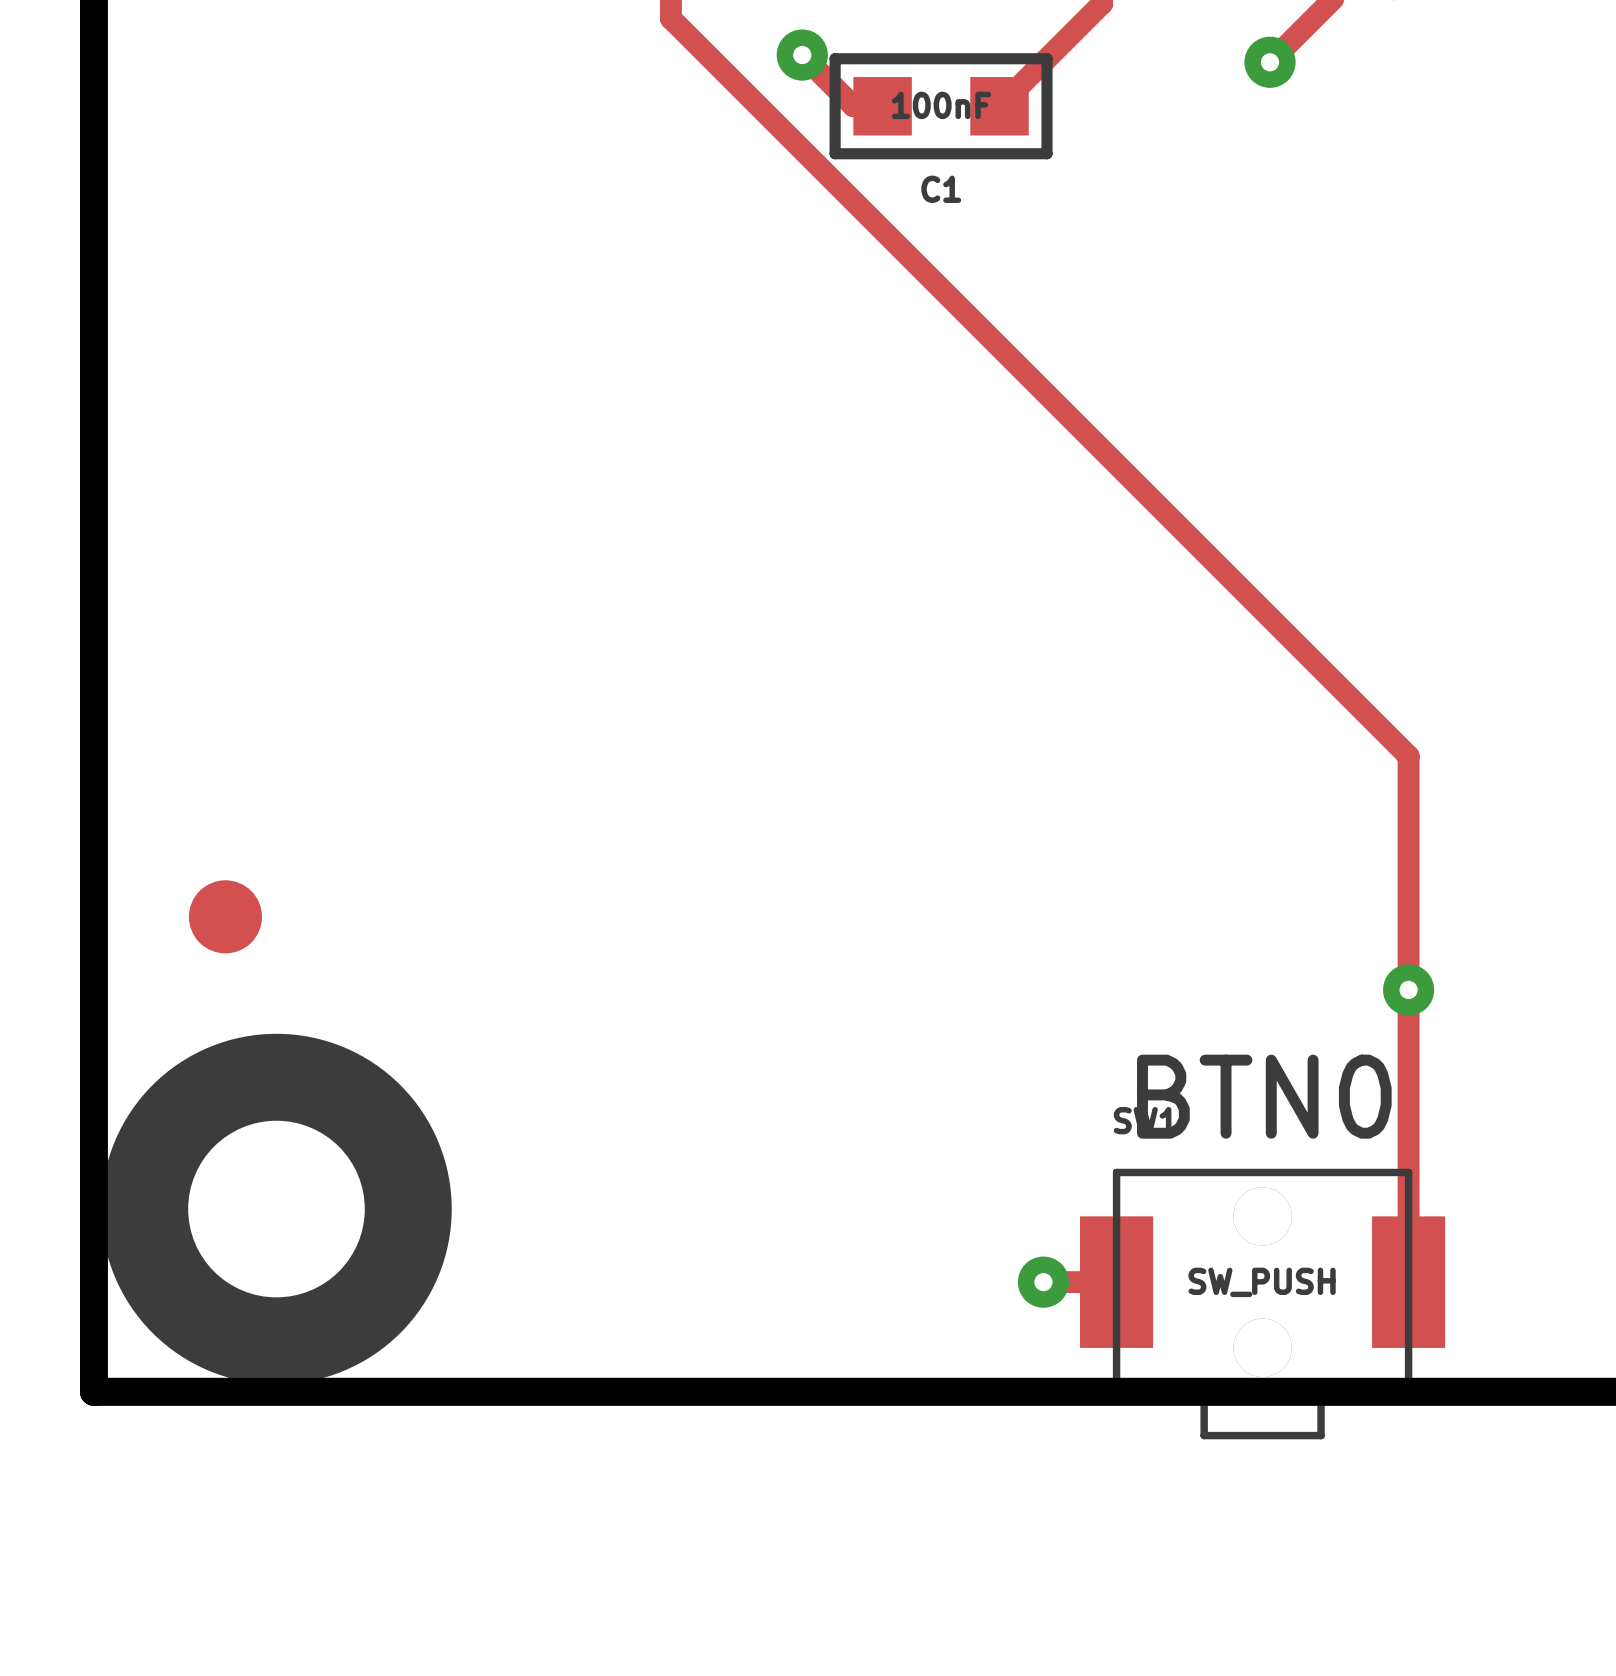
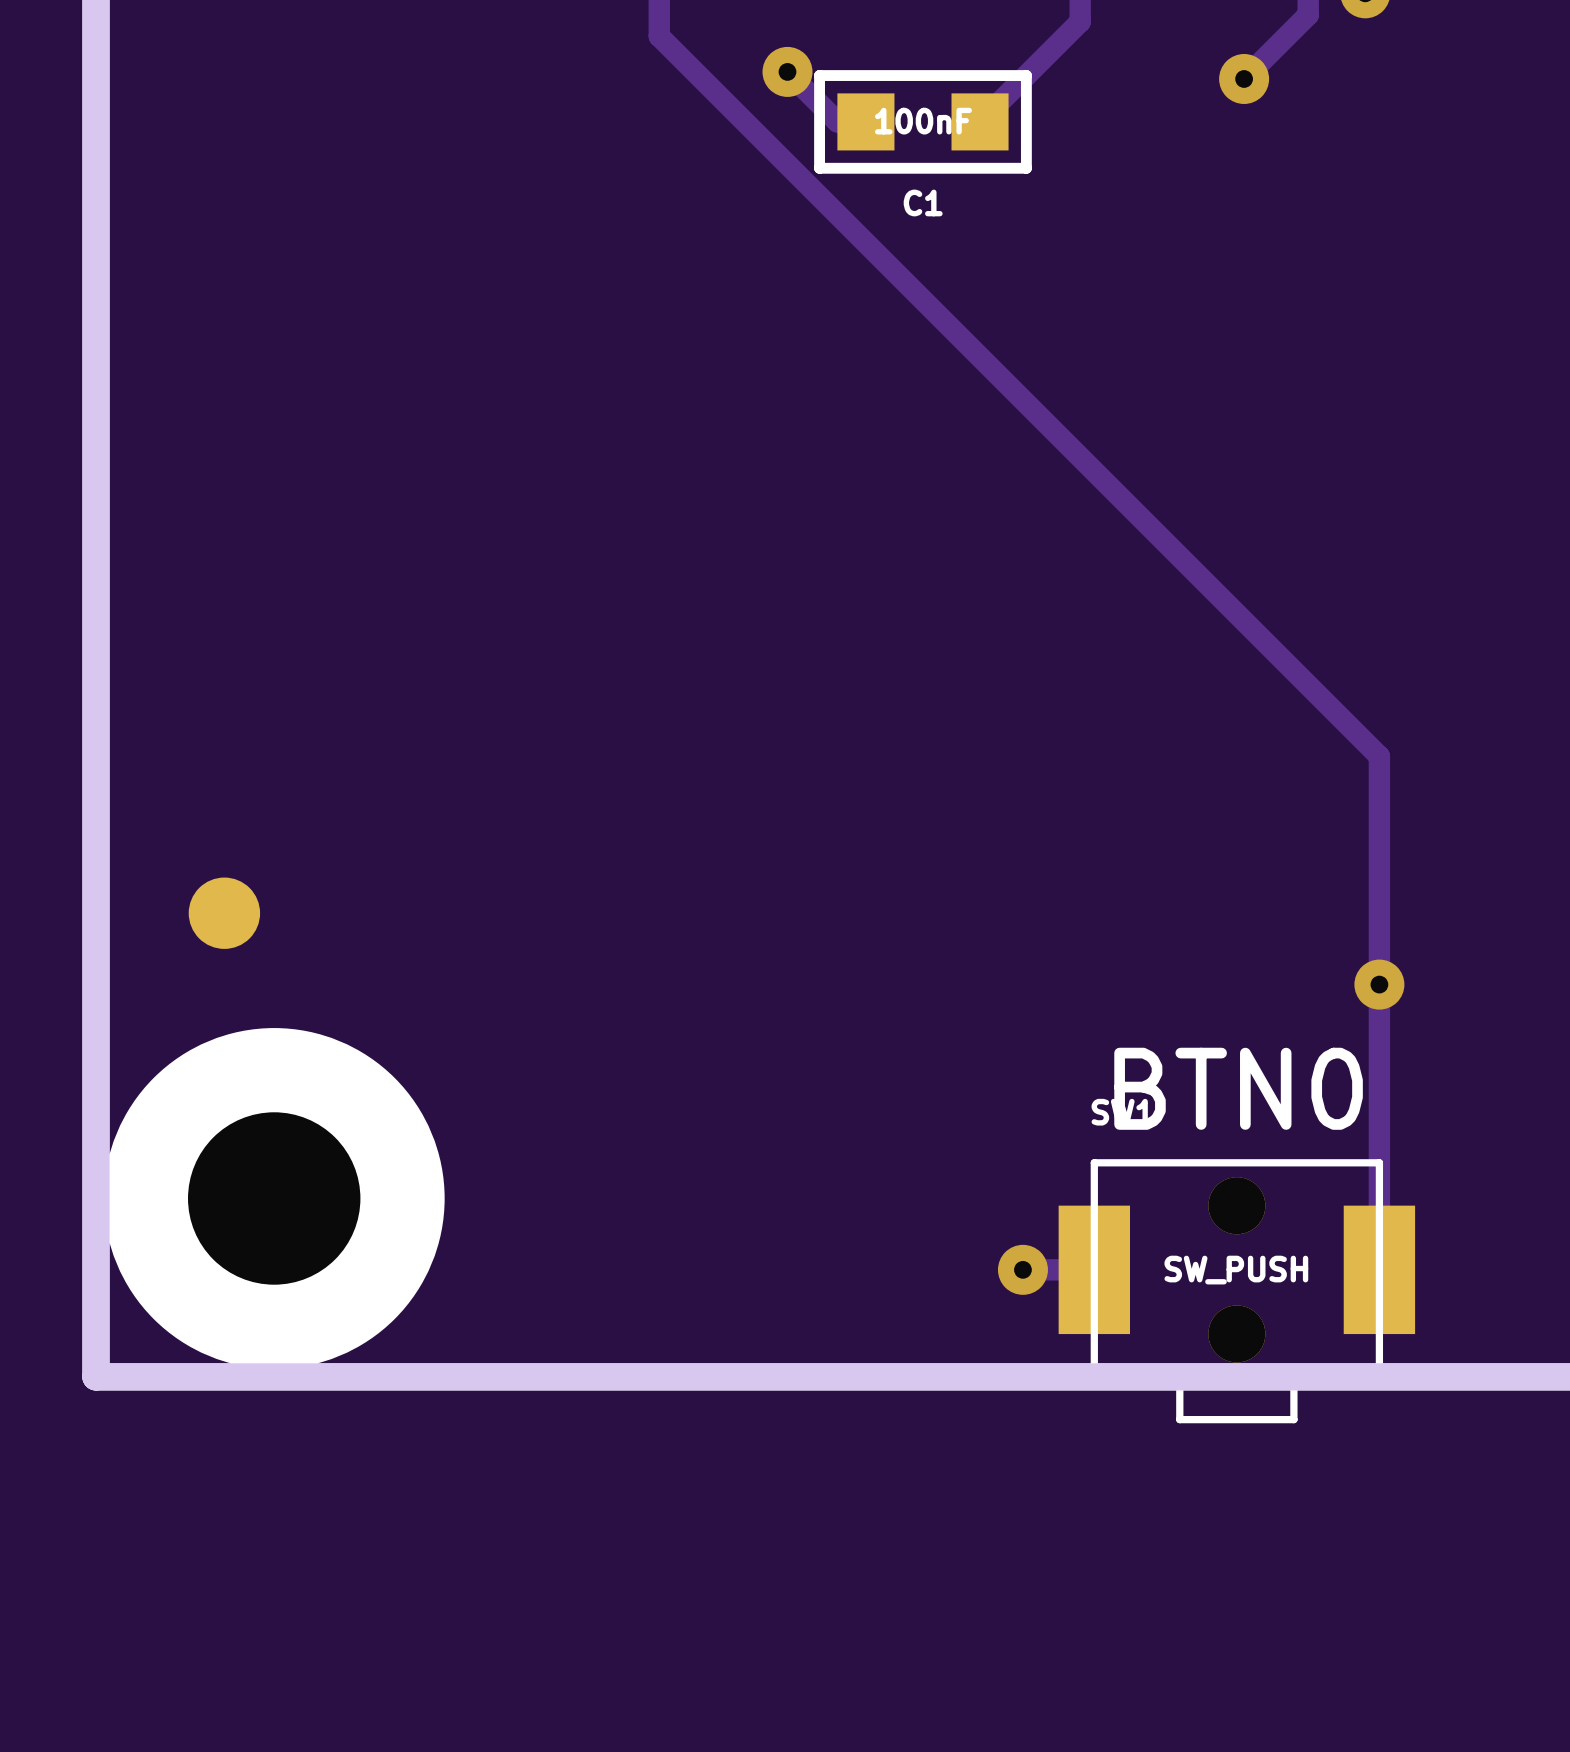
part footprint: [101, 1033, 452, 1385] -> [103, 1028, 445, 1369]

